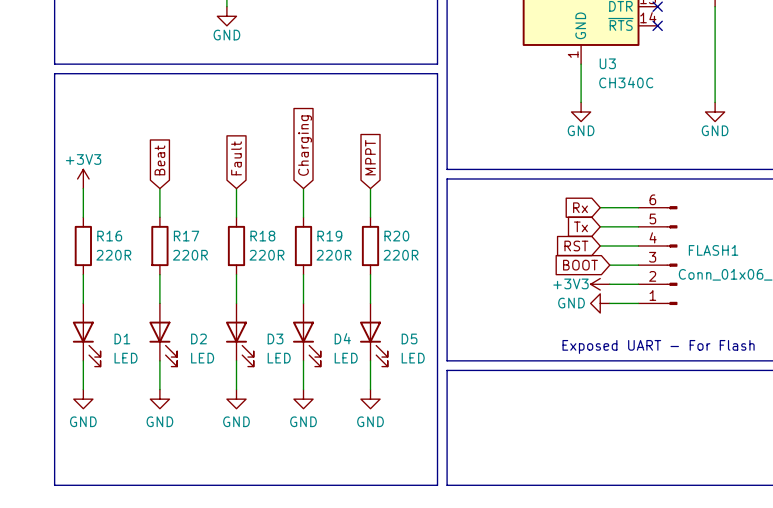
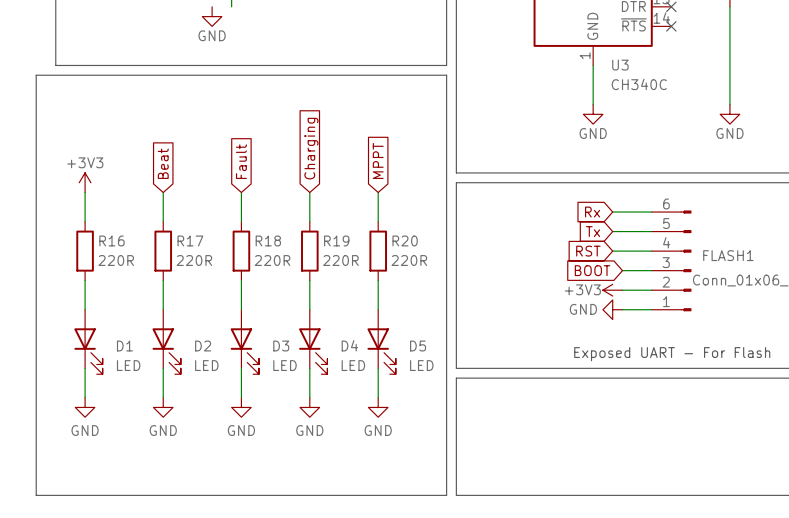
power symbol position: GND (226, 16) -> GND (212, 16)
line: (54, 73) (54, 485) -> (55, 75) (36, 75) (36, 495) (55, 495)

